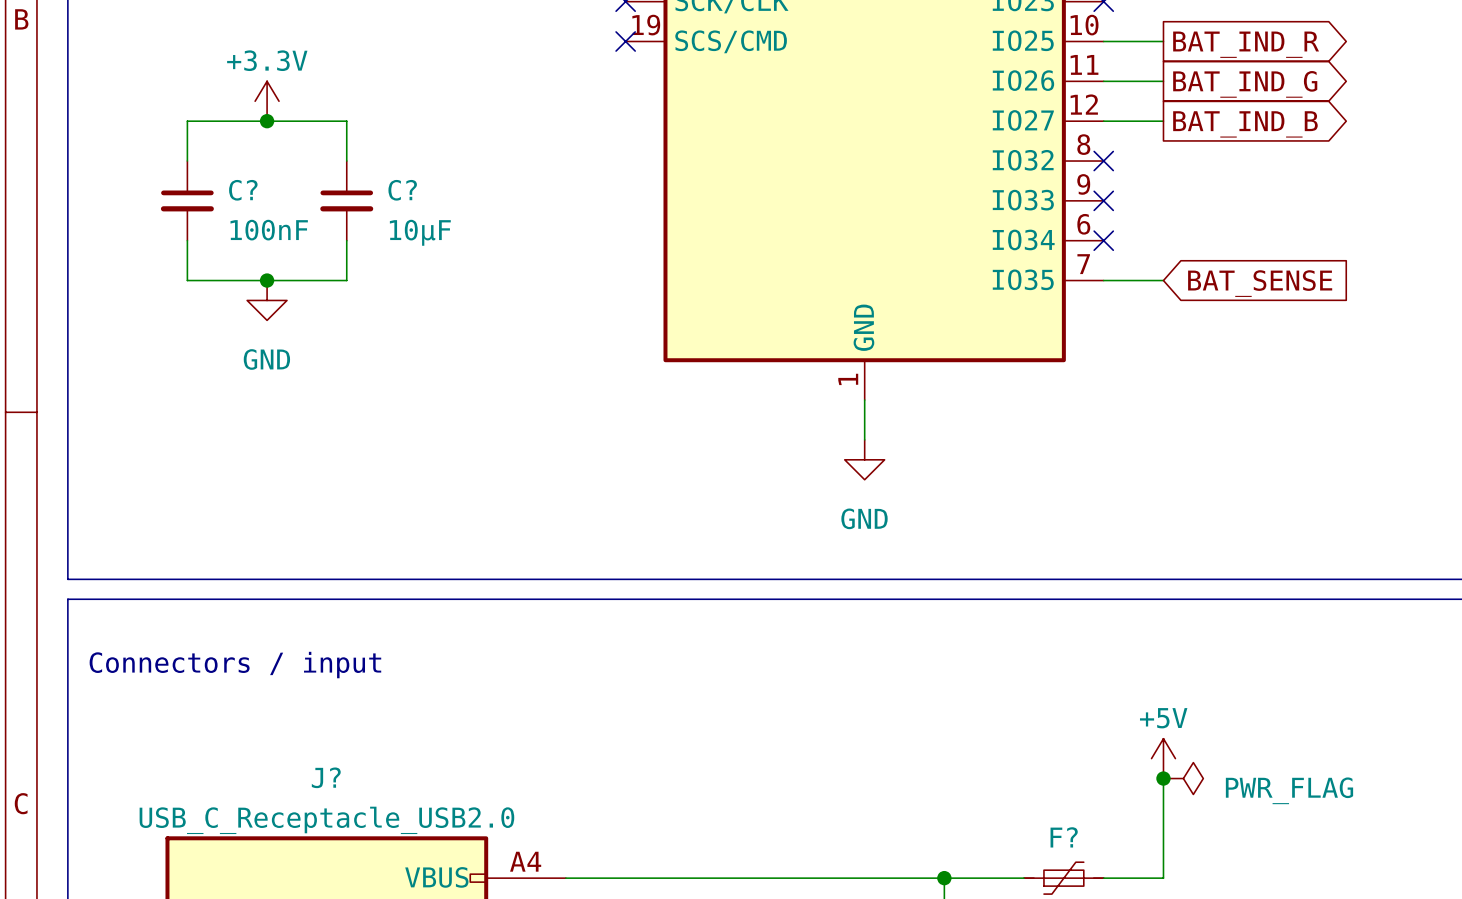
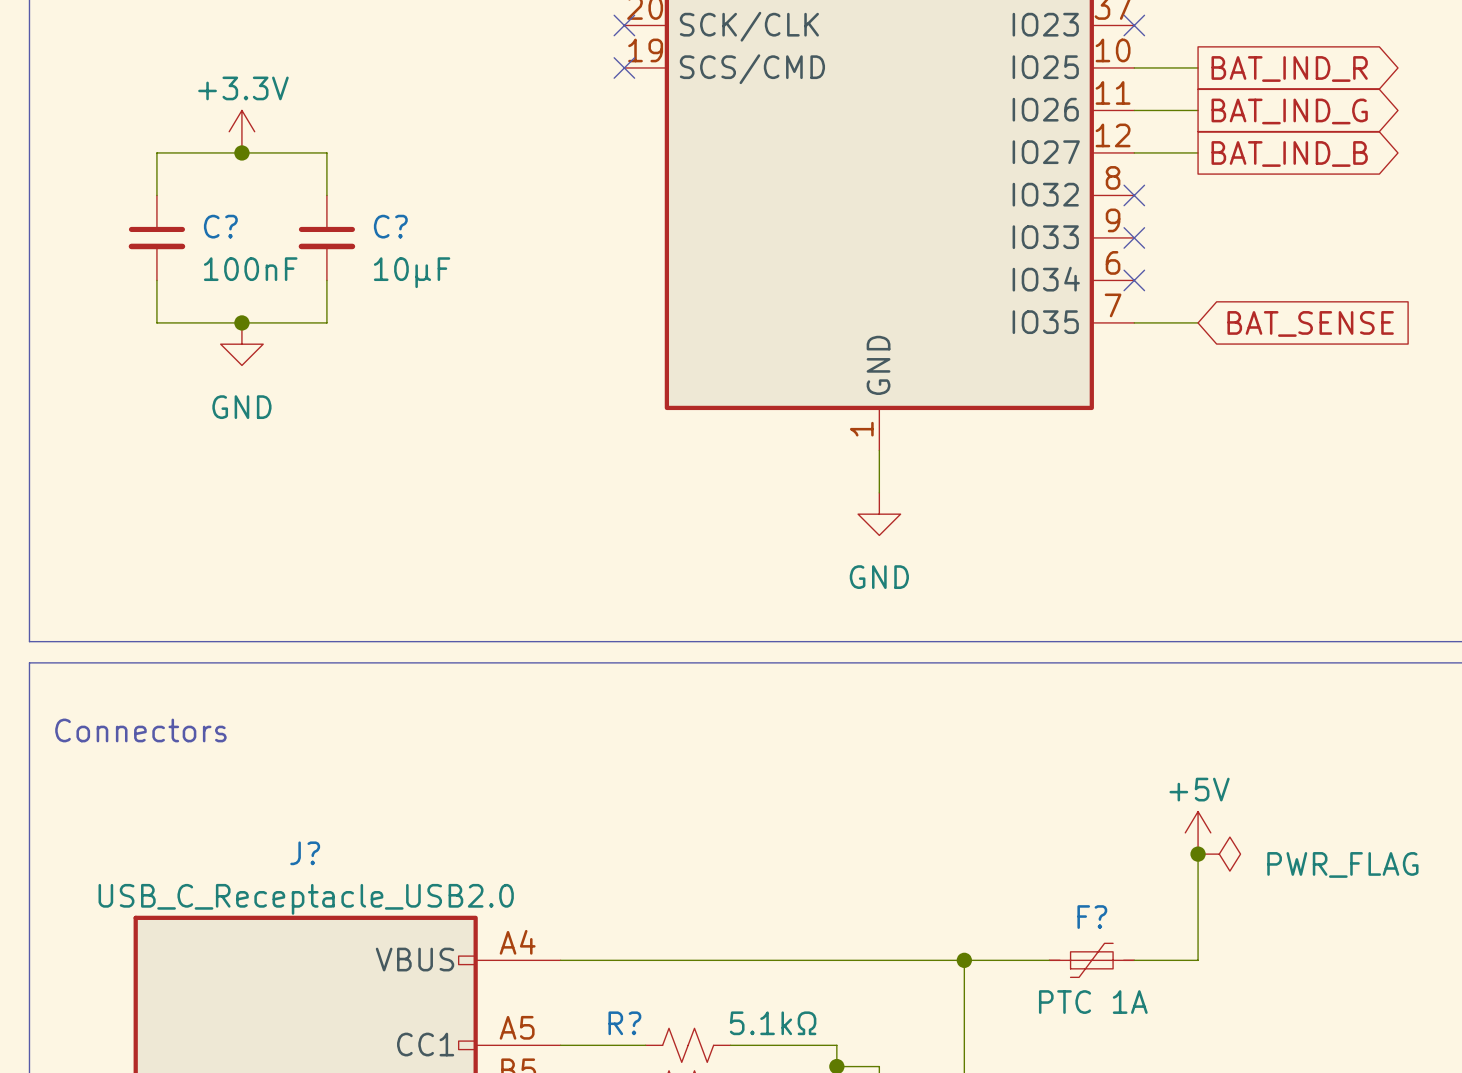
text: Connectors / input (235, 665) -> Connectors (140, 730)

